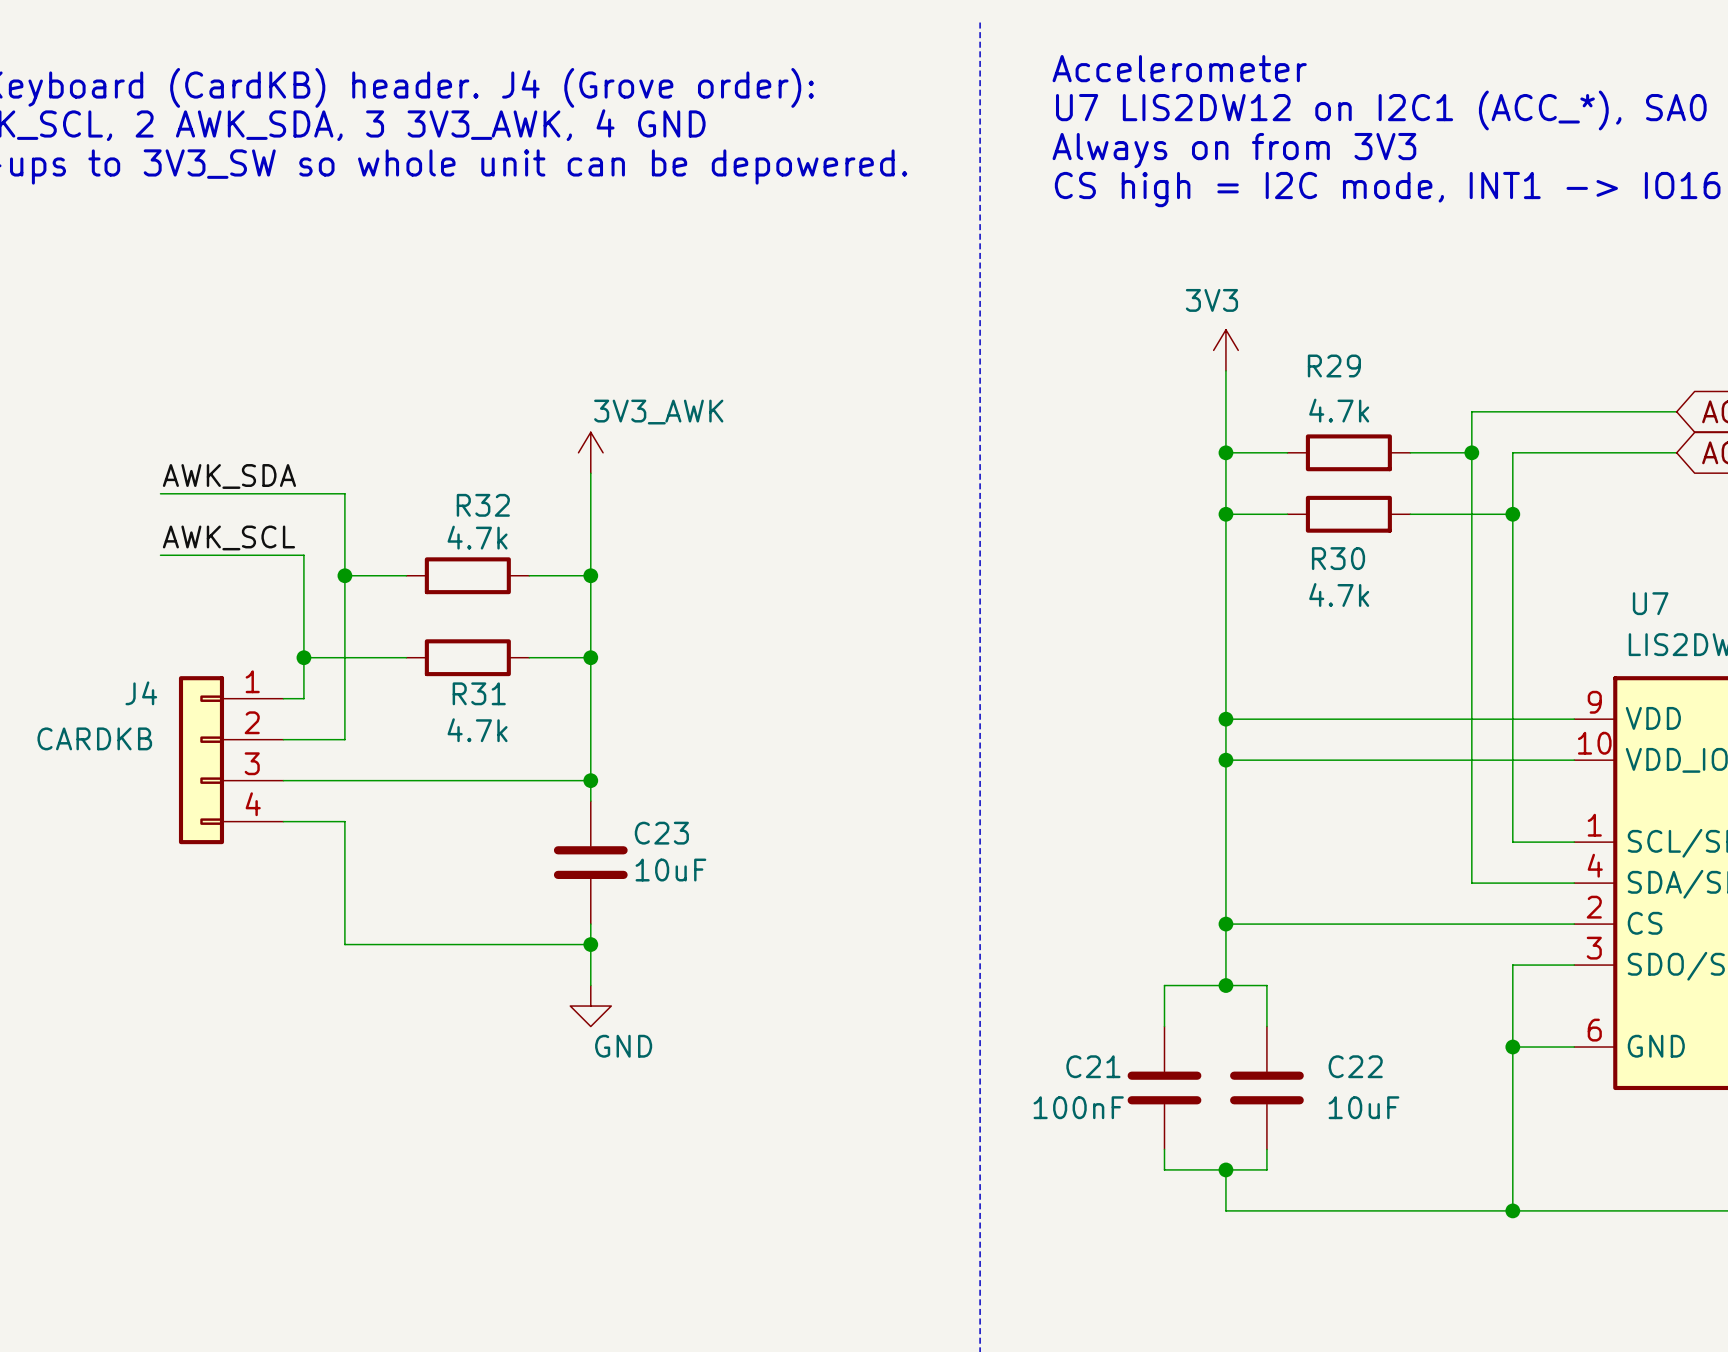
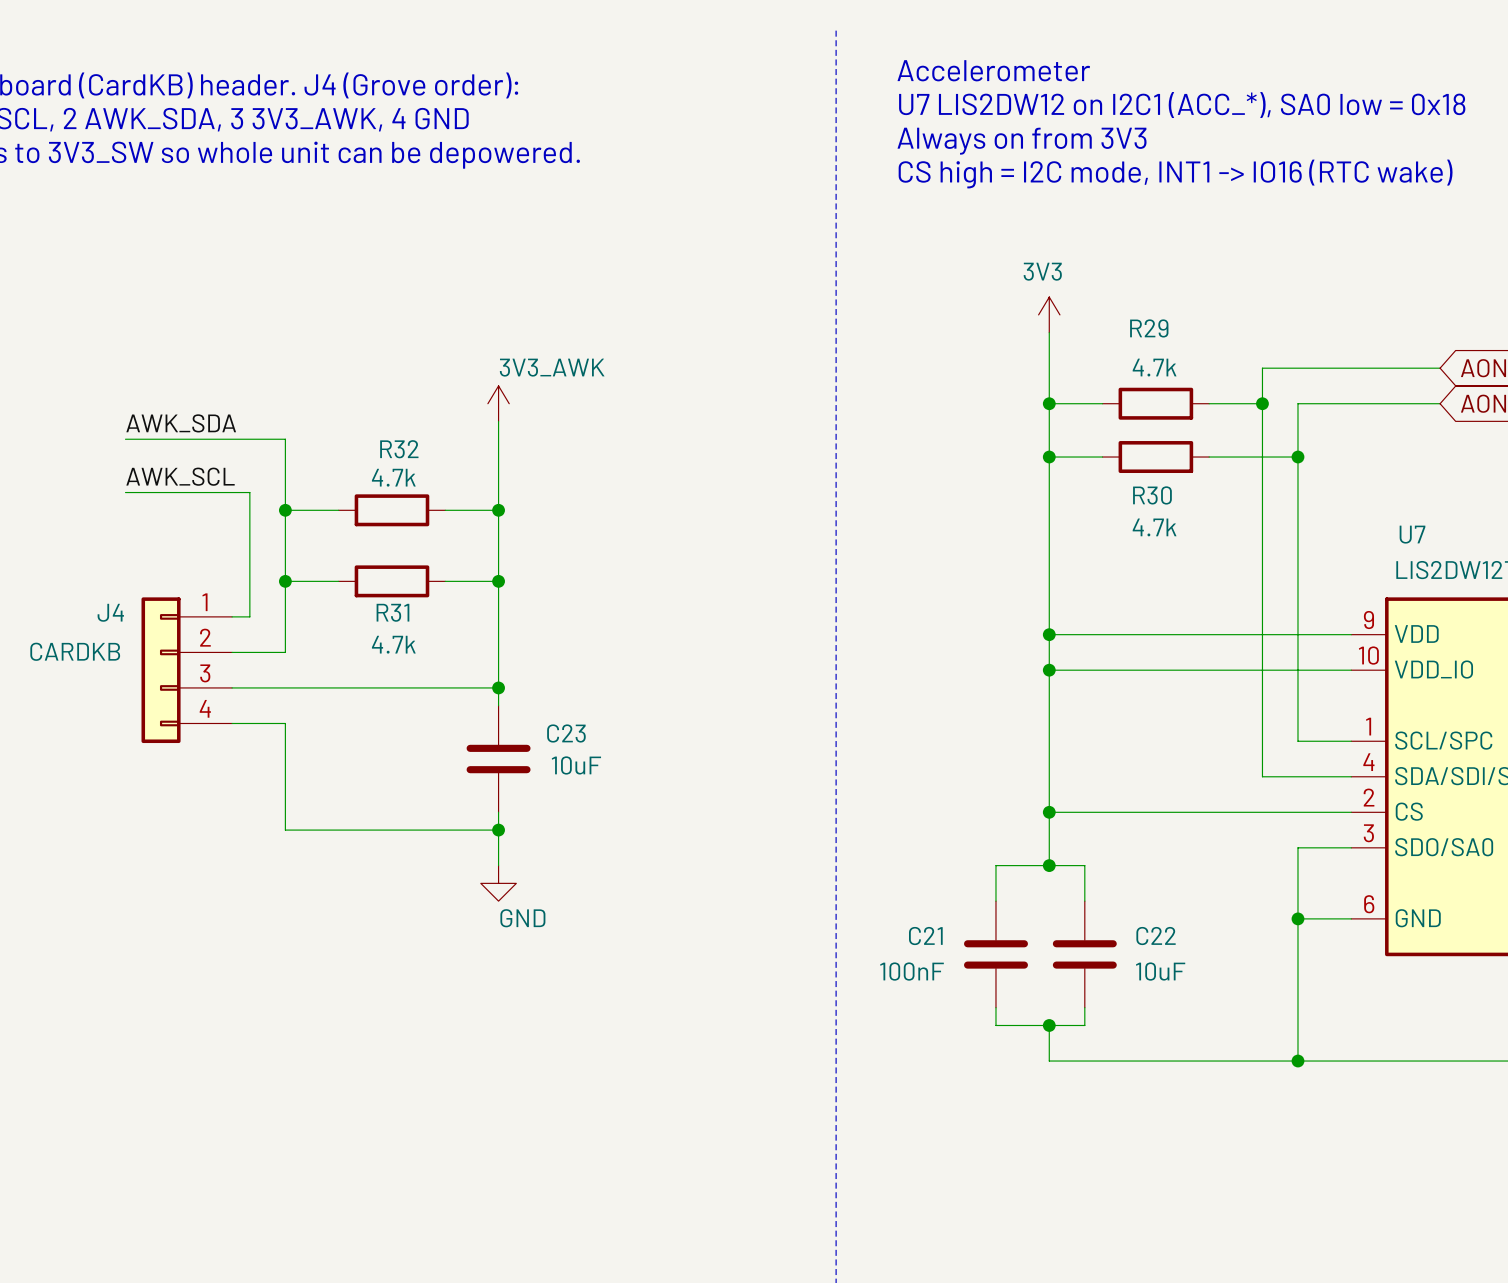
wire: (303, 657) (344, 657) -> none
junction position: (303, 657) -> (285, 581)

